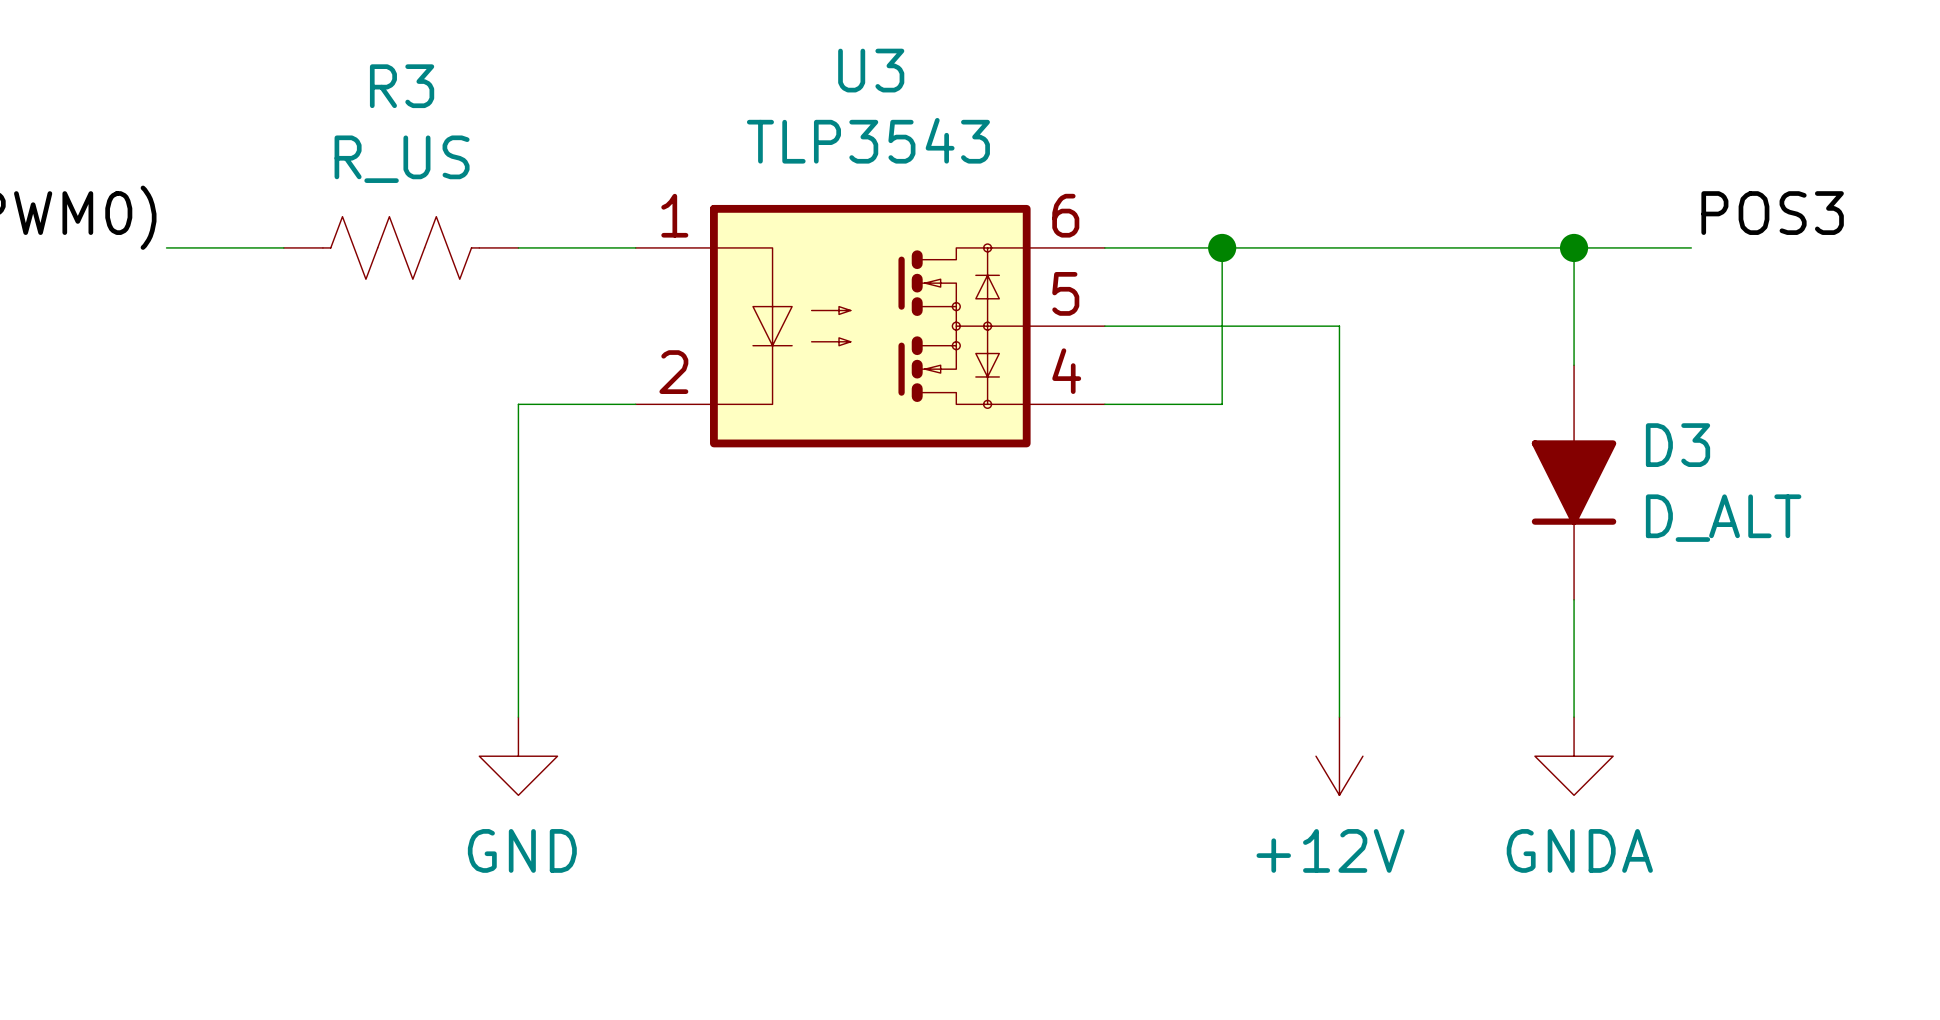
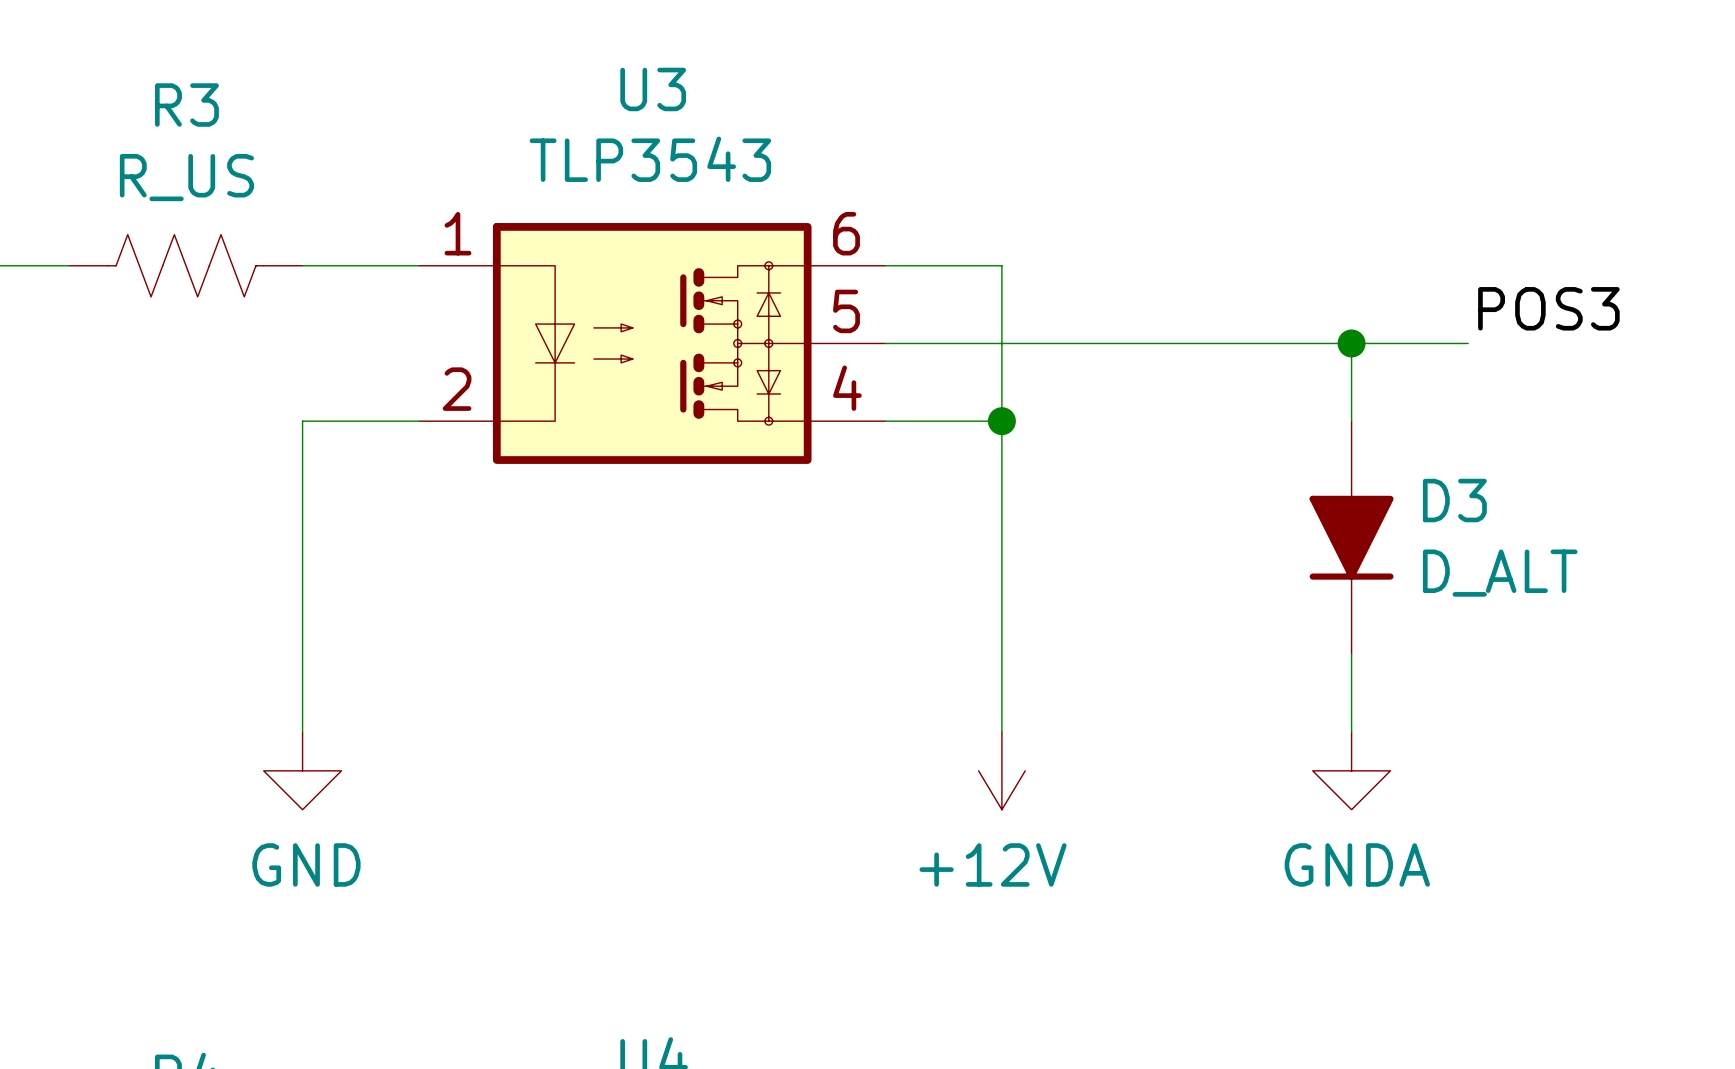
label position: POS3 (1772, 213) -> POS3 (1548, 308)
wire: (1222, 247) (1691, 247) -> none
junction position: (1222, 247) -> (1001, 421)
wire: (1574, 247) (1574, 326) -> none
junction position: (1574, 247) -> (1351, 343)
wire: (1339, 326) (1339, 717) -> (1118, 343) (1468, 343)
wire: none -> (1001, 421) (1001, 731)
D3 position: (1574, 482) -> (1351, 537)
power symbol position: +12V (1339, 756) -> +12V (1001, 770)

